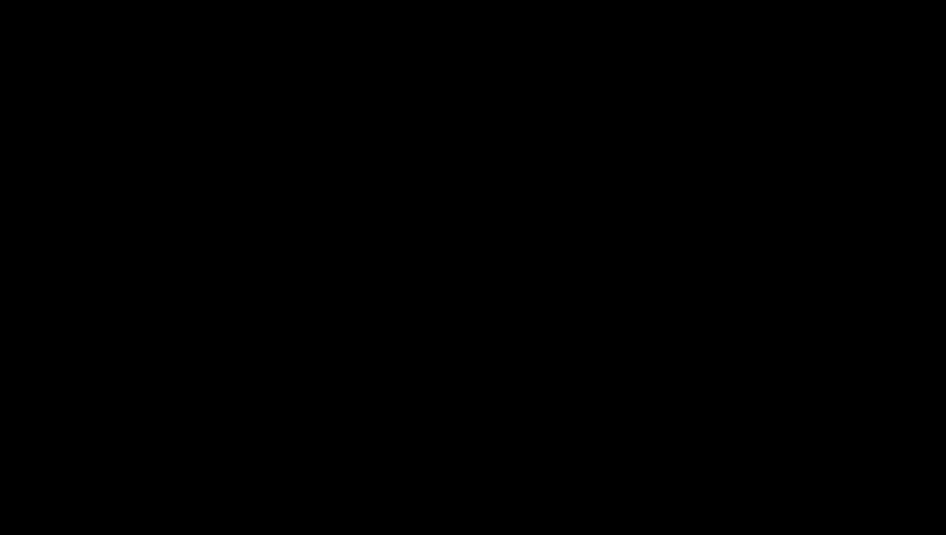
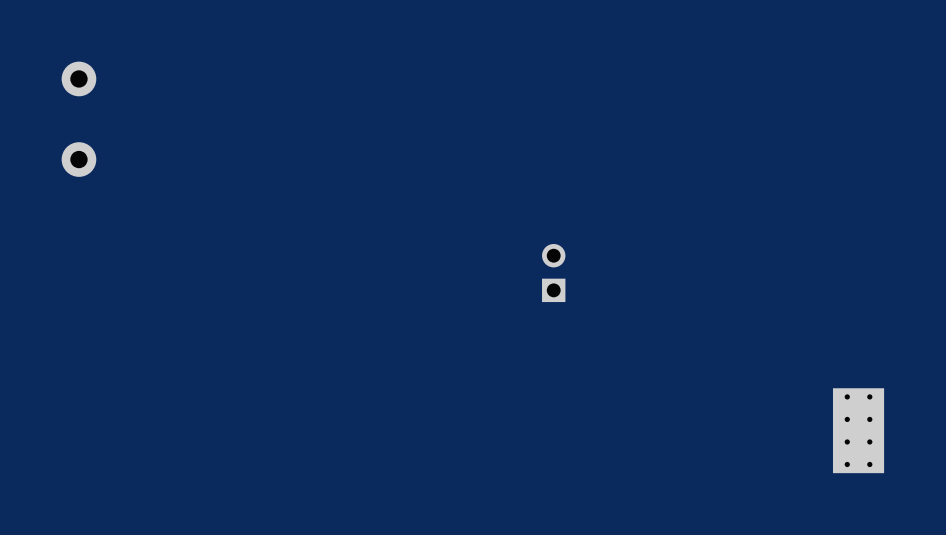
part: none -> (78, 78)
part: none -> (78, 159)
part: none -> (553, 273)
part: none -> (858, 430)

